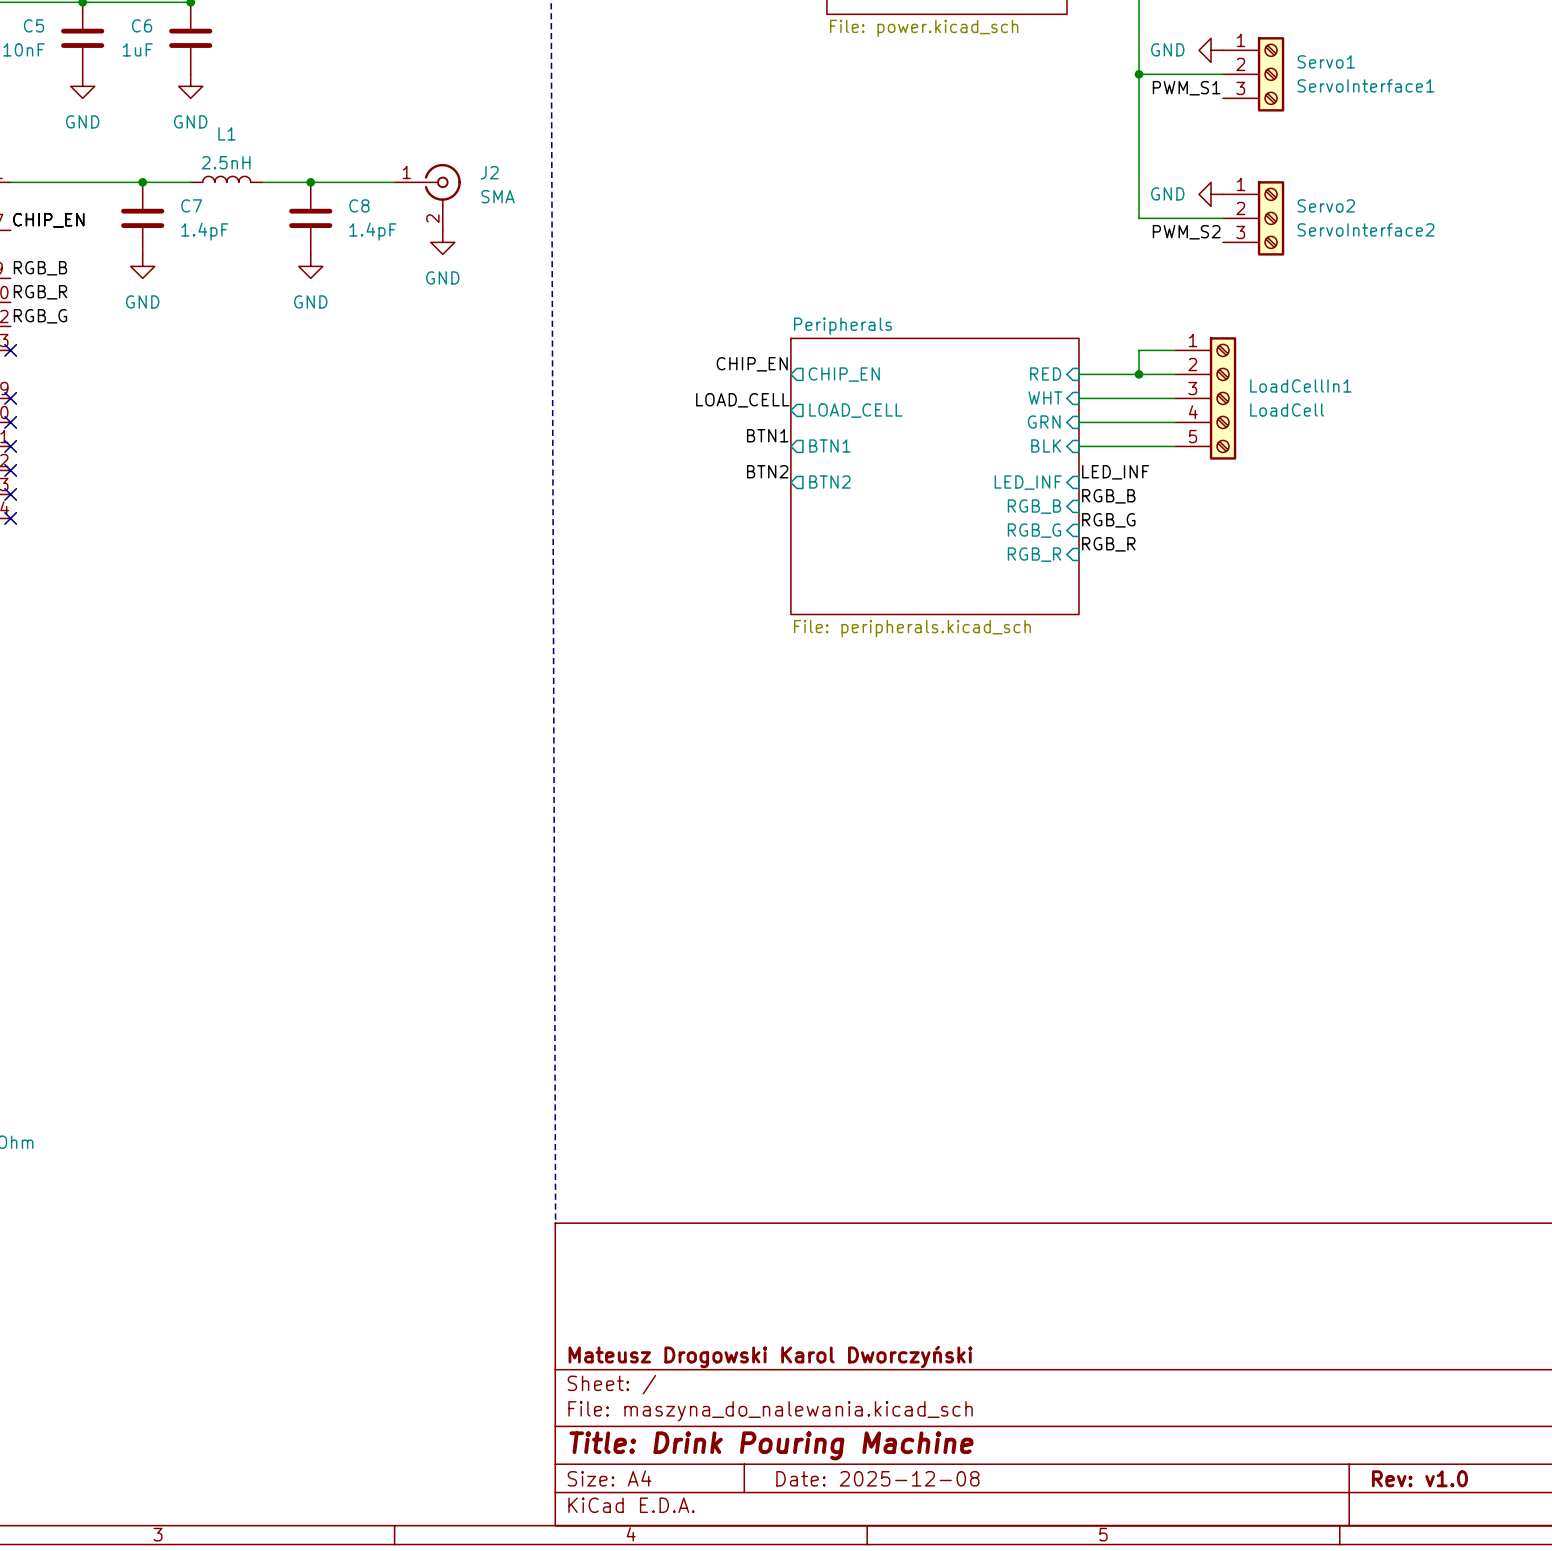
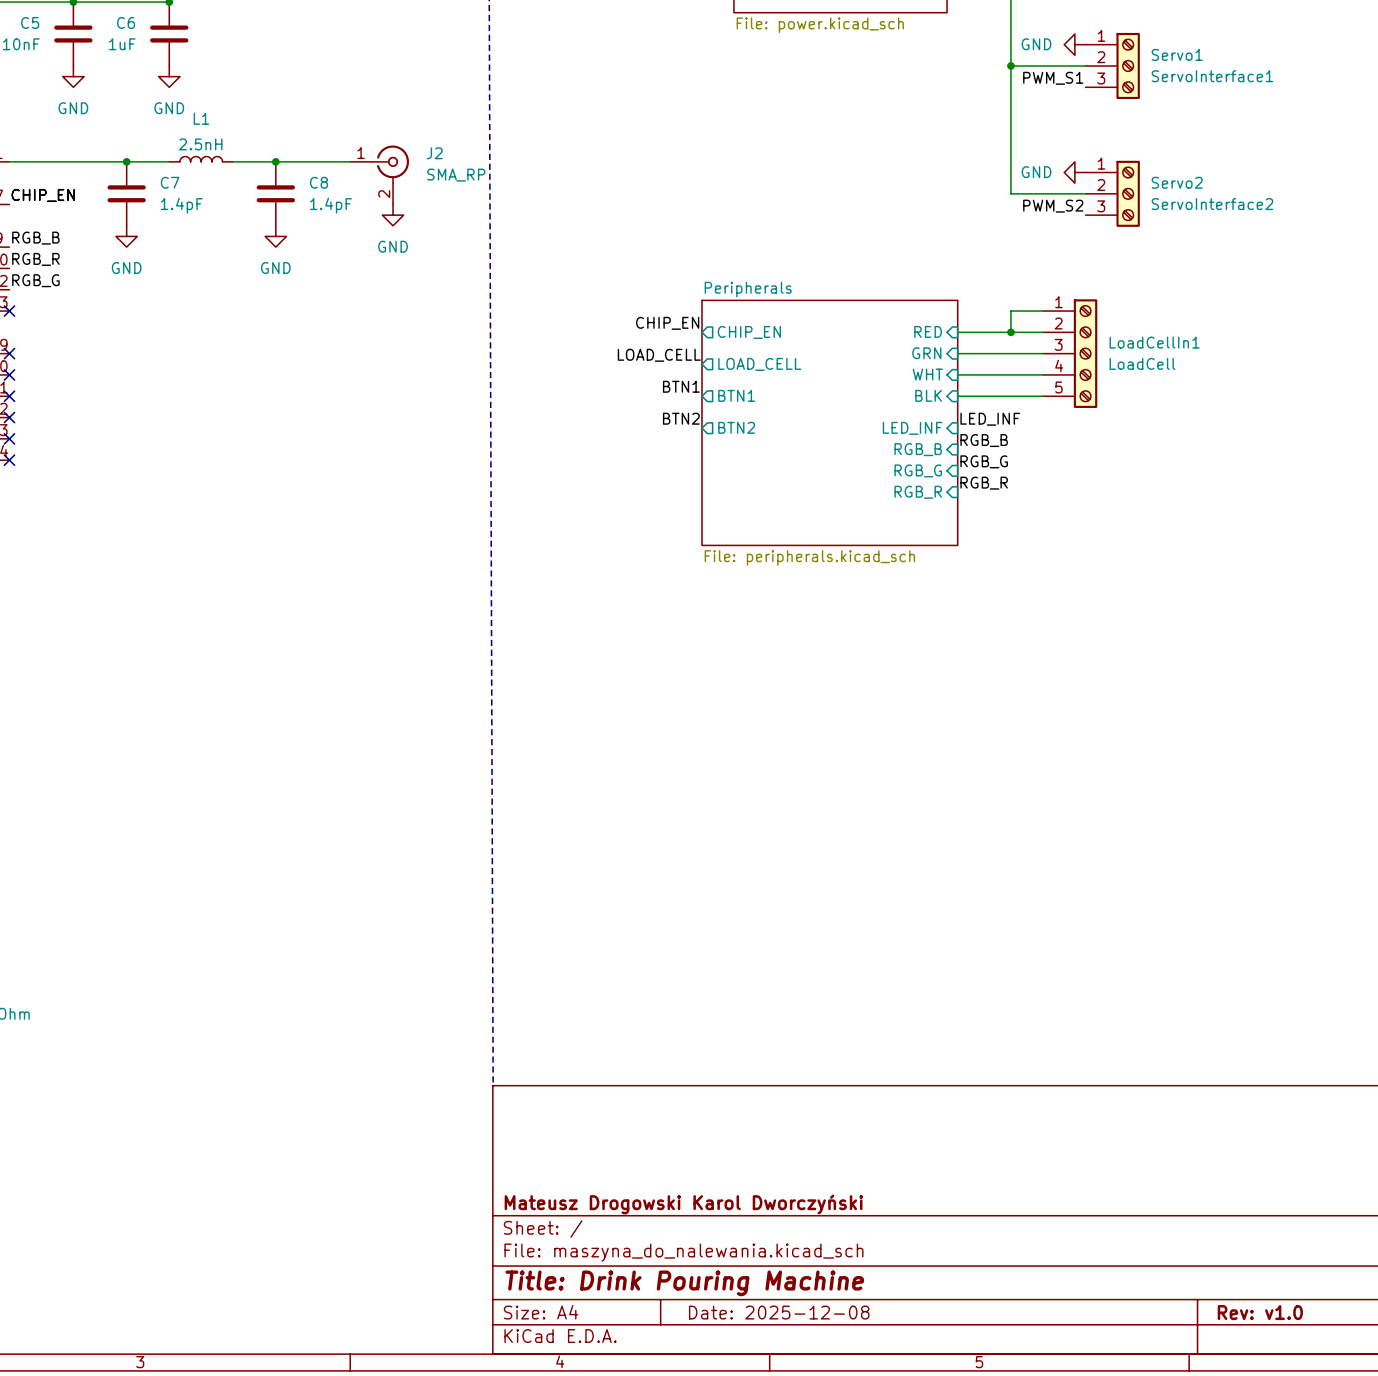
J2 value: SMA (498, 196) -> SMA_RP (456, 175)
sheet pin: WHT (1045, 397) -> GRN (926, 353)
sheet pin: GRN (1044, 421) -> WHT (927, 374)

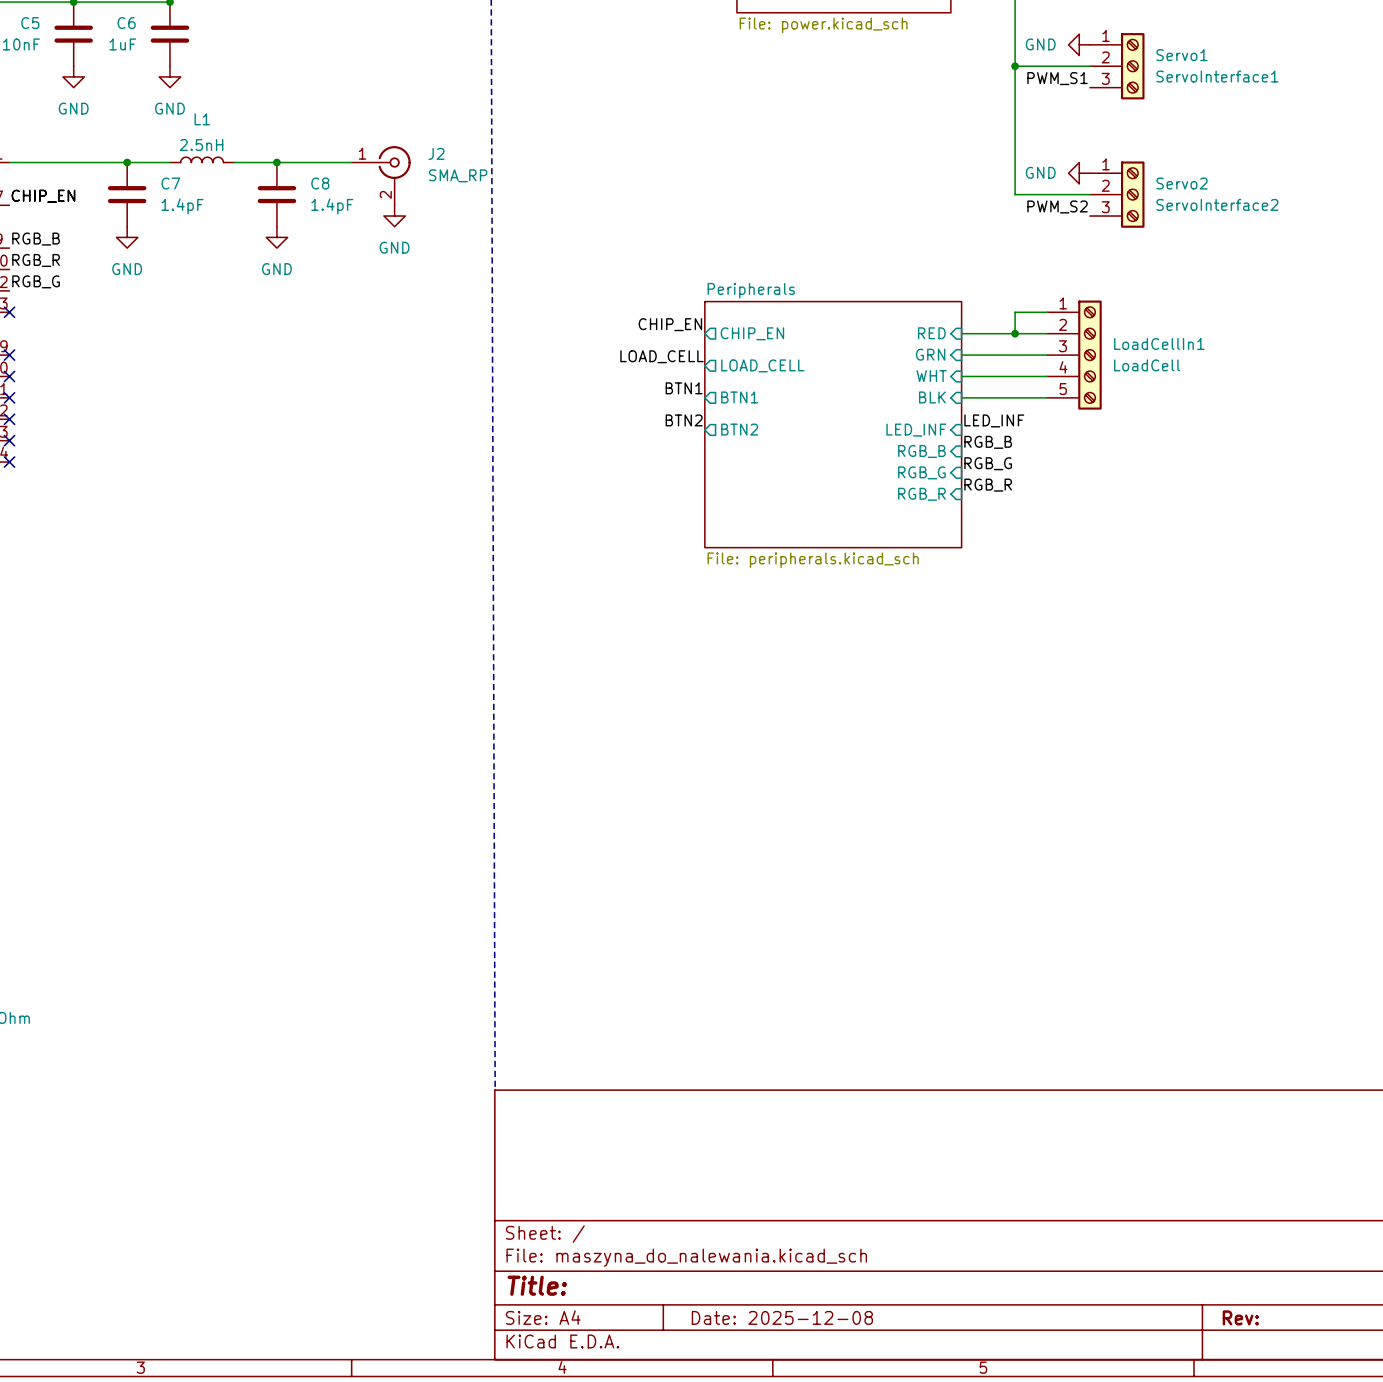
title block: Mateusz Drogowski Karol Dworczyński (683, 1204) -> none
title block: Title: Drink Pouring Machine (684, 1283) -> Title: (537, 1285)
title block: Rev: v1.0 (1260, 1312) -> Rev: (1240, 1317)

